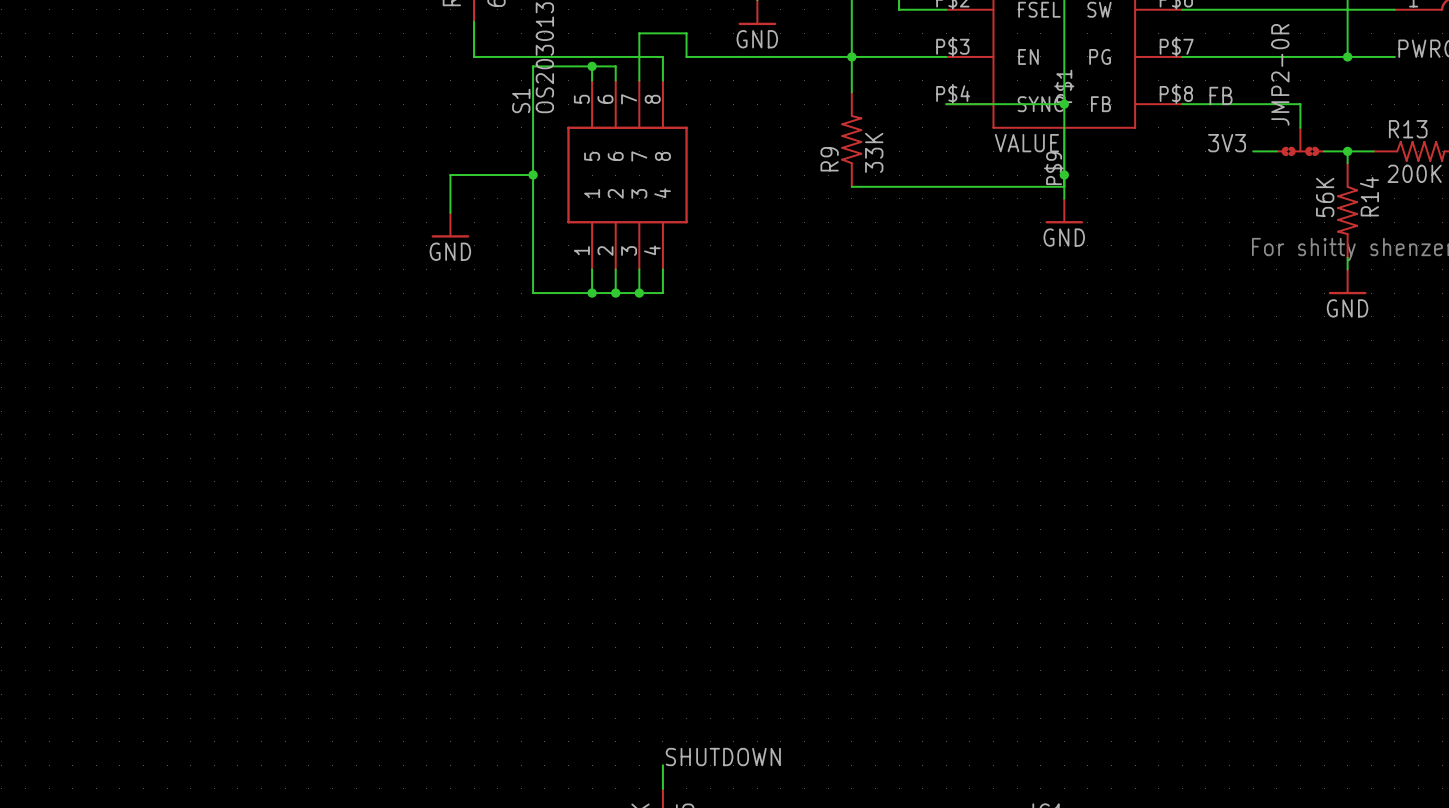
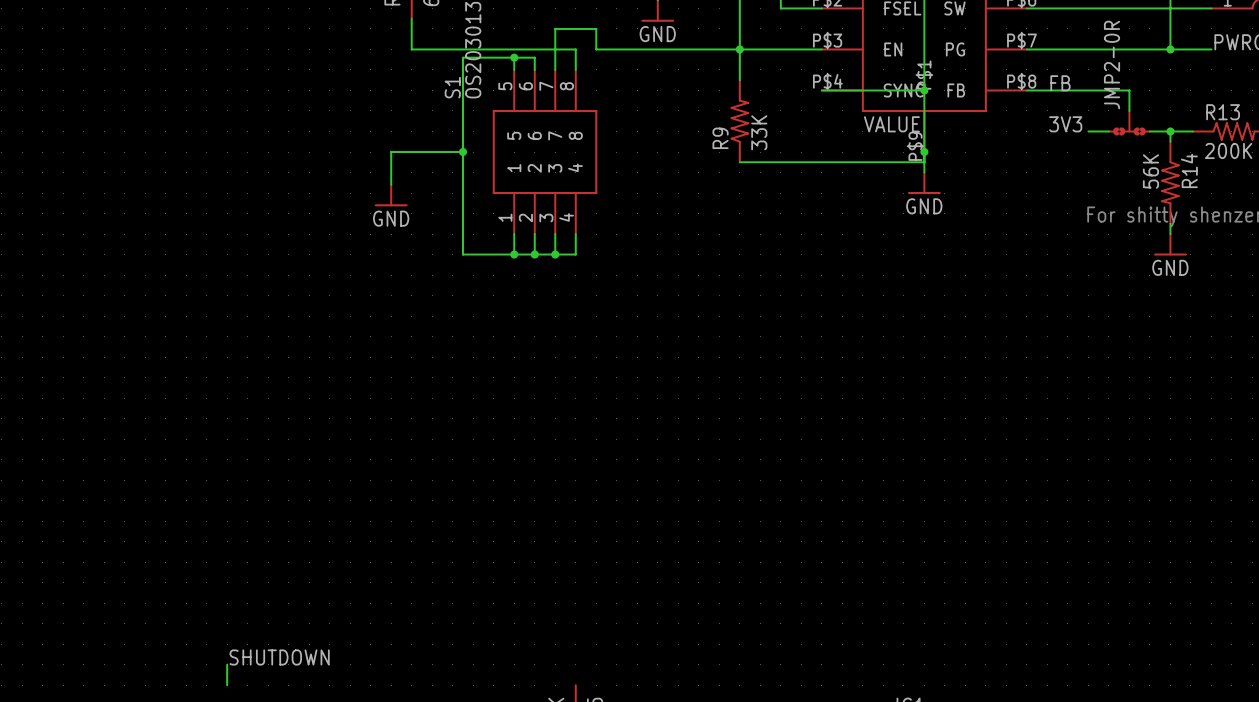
label: none -> SHUTDOWN (279, 657)
label: SHUTDOWN (723, 757) -> none
wire: none -> (227, 664) (227, 685)
wire: (662, 765) (662, 788) -> none

